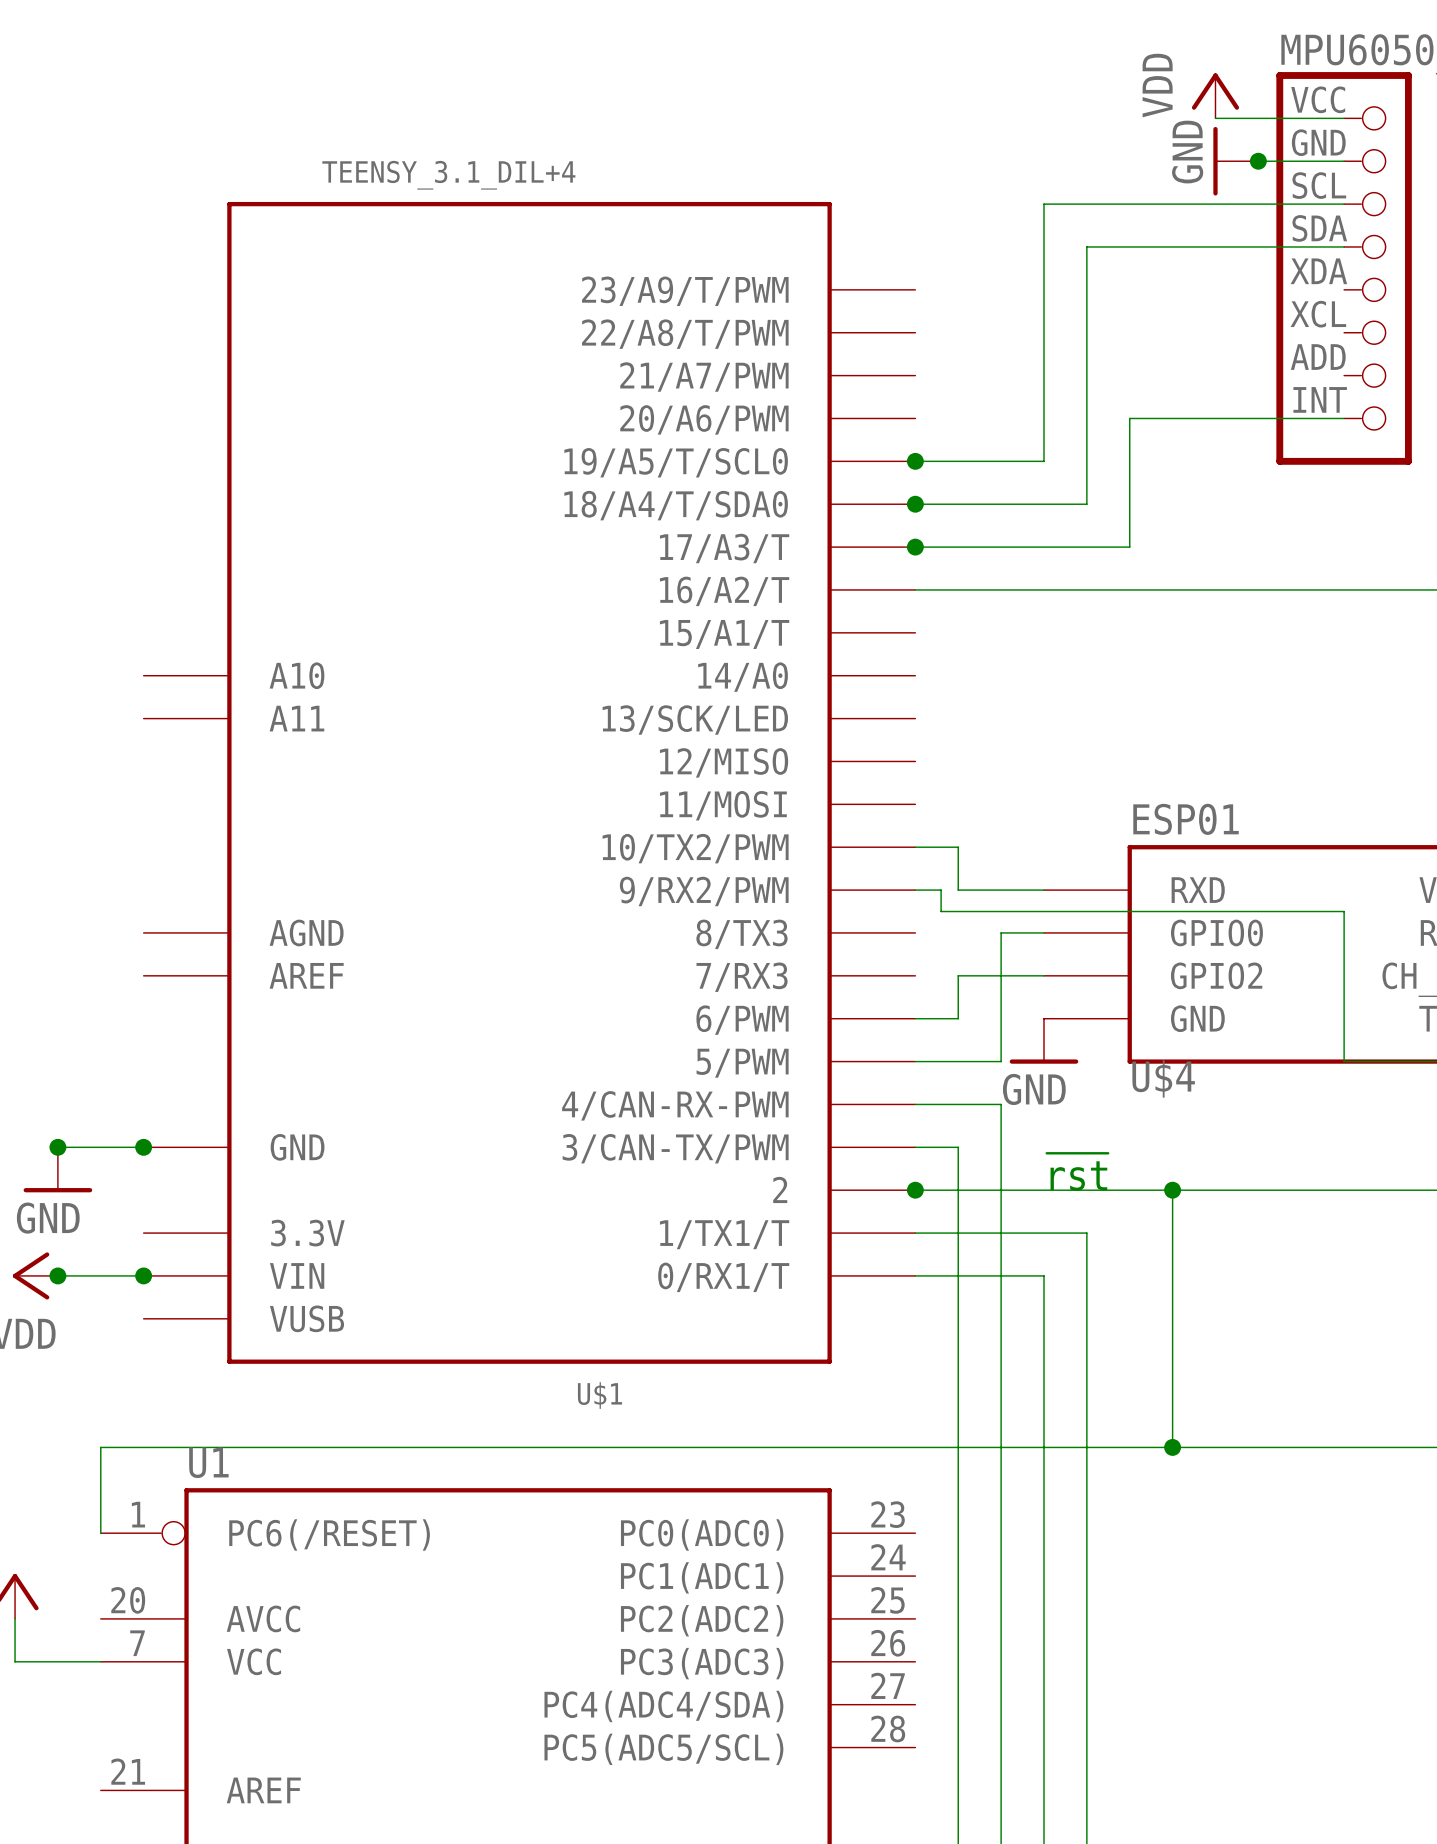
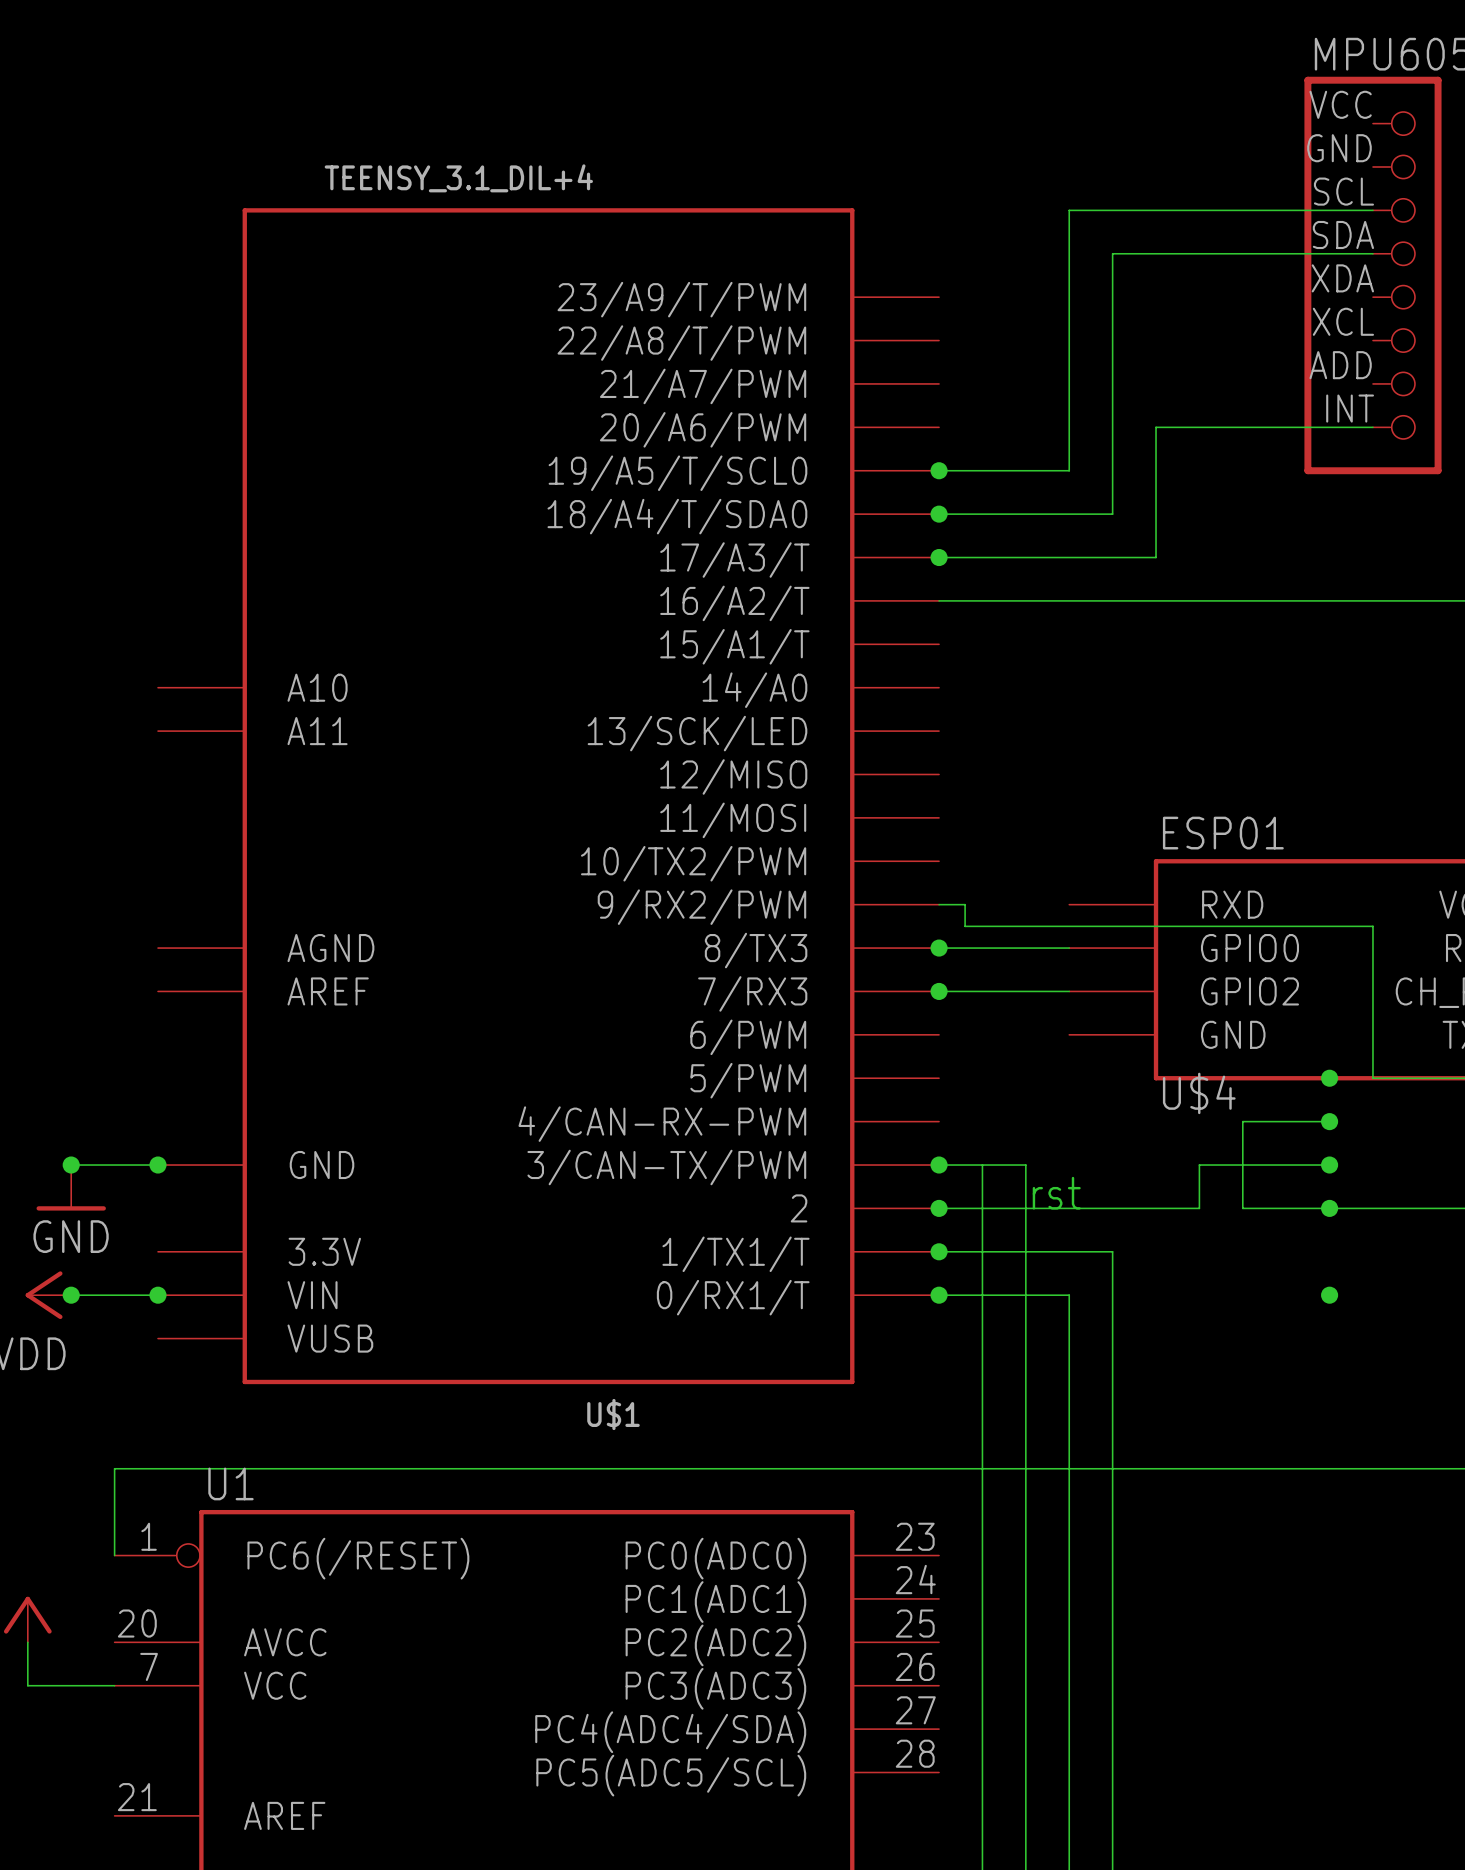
power symbol: VDD (1215, 95) -> none
wire: (1215, 118) (1344, 118) -> none
power symbol: GND (1235, 161) -> none
wire: (1258, 161) (1344, 161) -> none
junction: (1258, 161) -> none
wire: (915, 847) (958, 847) (958, 890) (1043, 890) -> none
junction: none -> (939, 948)
wire: (1001, 932) (1001, 1061) (915, 1061) -> (1025, 948) (939, 948)
junction: none -> (939, 991)
wire: (958, 975) (958, 1018) (915, 1018) -> (982, 991) (939, 991)
power symbol: GND (1043, 1041) -> none
junction: none -> (1329, 1078)
wire: (915, 1104) (1001, 1104) (1001, 1147) -> (982, 1165) (1025, 1165)
junction: none -> (1329, 1121)
junction: none -> (939, 1165)
wire: none -> (1329, 1165) (1199, 1165) (1199, 1208)
junction: none -> (1329, 1165)
text: ~{rst} (1077, 1172) -> rst (1056, 1193)
junction: (1172, 1190) -> none
wire: (1215, 1190) (1172, 1190) (1172, 1447) -> (1242, 1208) (1242, 1121) (1329, 1121)
junction: none -> (1329, 1208)
junction: none -> (939, 1251)
junction: none -> (939, 1295)
junction: none -> (1329, 1295)
junction: (1172, 1447) -> none

